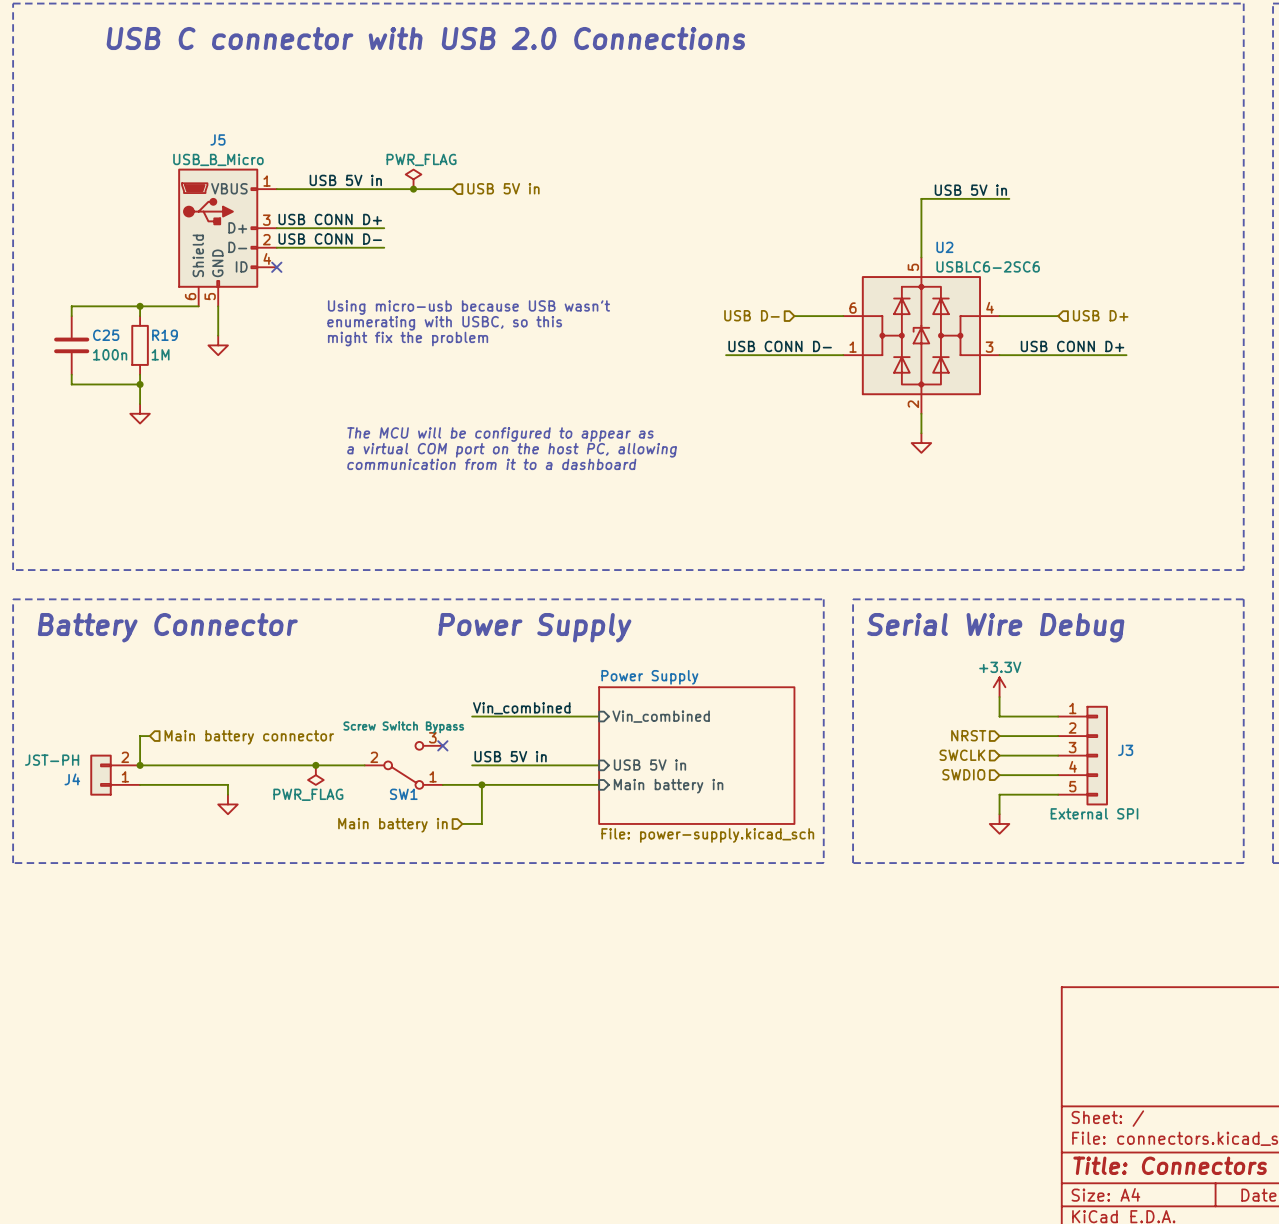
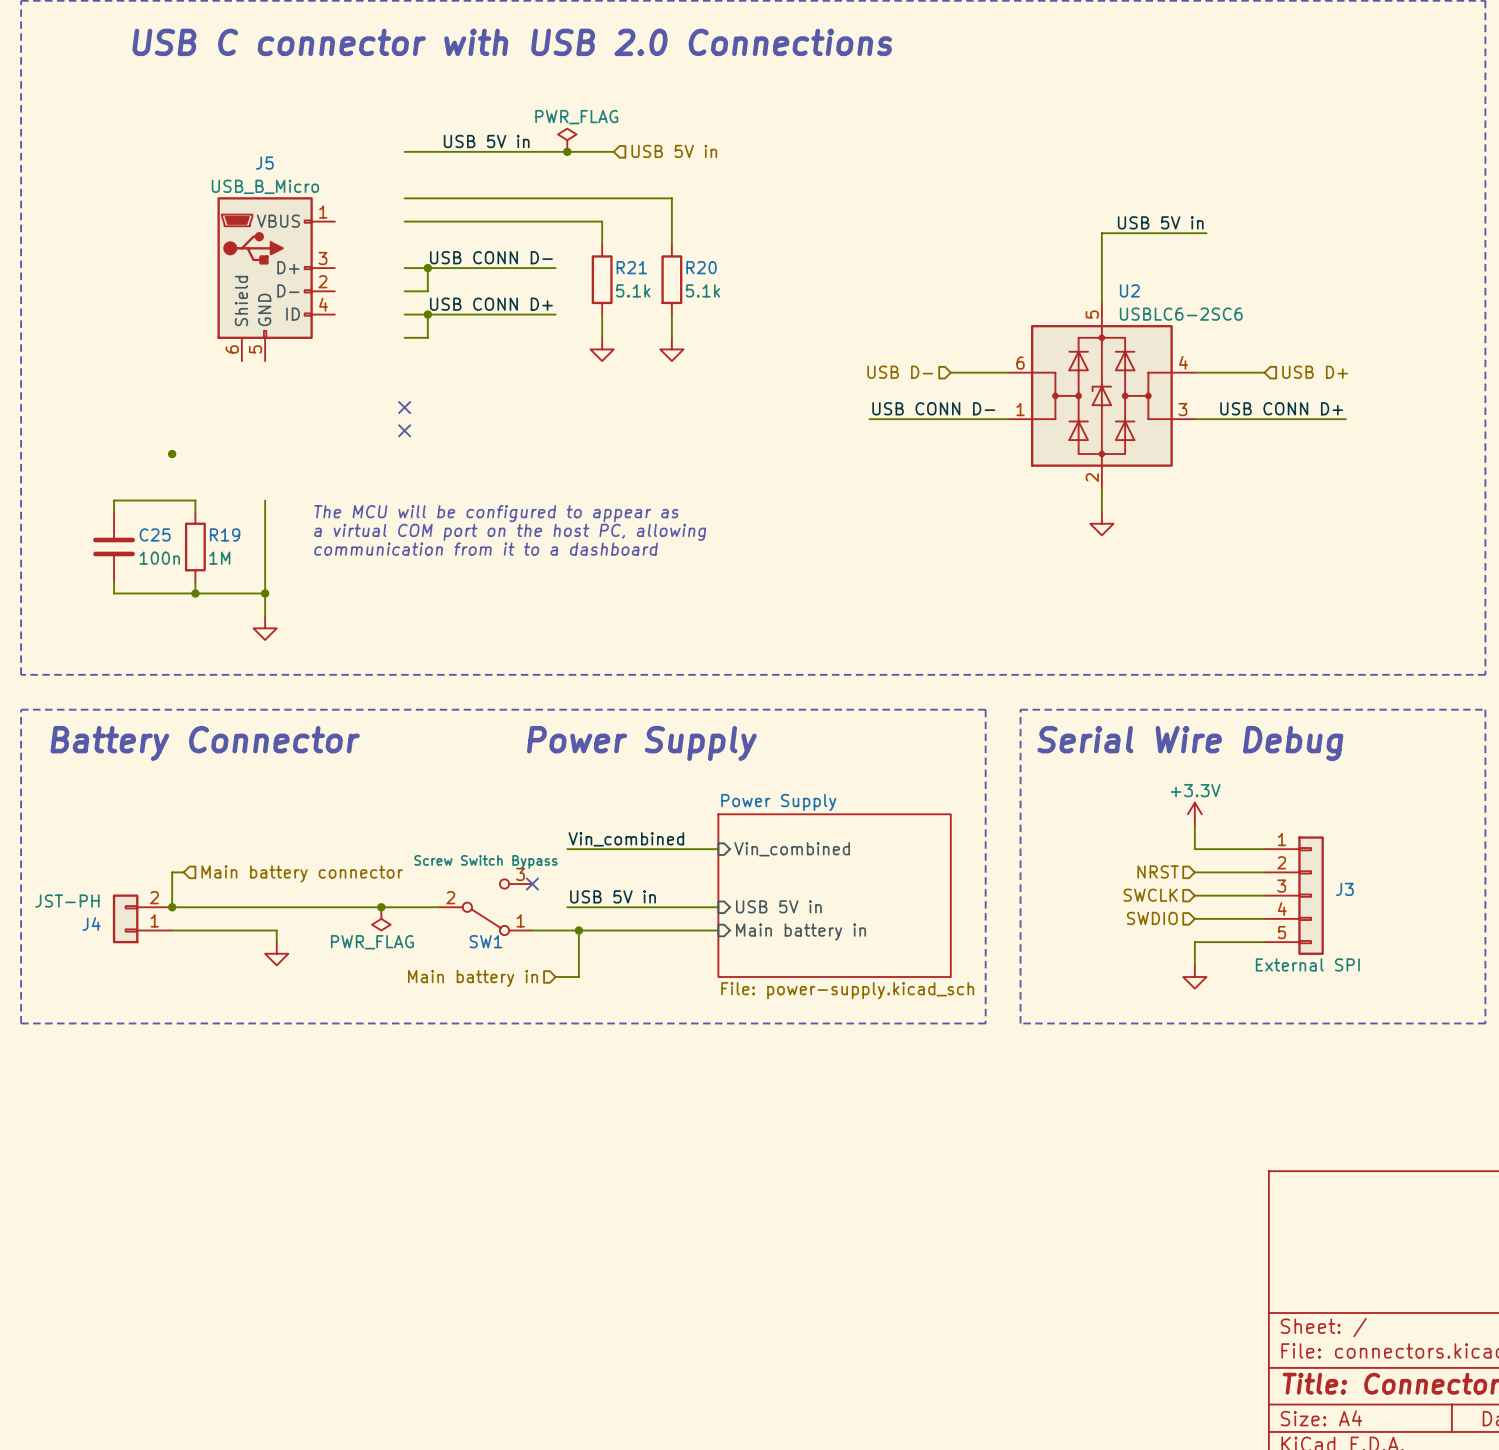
wire: none -> (404, 151) (613, 151)
junction: none -> (567, 151)
wire: none -> (404, 198) (671, 198) (671, 244)
power symbol position: PWR_FLAG (413, 179) -> PWR_FLAG (567, 140)
label position: USB 5V in (345, 180) -> USB 5V in (486, 141)
hierarchical label position: USB 5V in (503, 188) -> USB 5V in (674, 151)
wire: (276, 189) (335, 189) -> none
junction: (413, 189) -> none
wire: none -> (544, 221) (602, 221) (602, 244)
label position: USB CONN D+ (330, 219) -> USB CONN D+ (491, 304)
wire: (276, 228) (335, 228) -> none
junction: none -> (427, 268)
wire: none -> (462, 268) (555, 268)
R21: none -> 5.1k (602, 279)
R20: none -> 5.1k (671, 279)
label position: USB CONN D- (330, 239) -> USB CONN D- (491, 257)
wire: (276, 247) (335, 247) -> none
wire: (354, 247) (384, 247) -> (427, 291) (427, 268)
no-connect mark: (276, 267) -> none
wire: none -> (404, 314) (555, 314)
wire: none -> (427, 314) (427, 337) (404, 337)
junction: none -> (427, 314)
wire: none -> (602, 314) (602, 337)
wire: none -> (671, 314) (671, 337)
power symbol: none -> (602, 349)
power symbol: none -> (671, 349)
wire: (140, 306) (140, 316) -> (195, 581) (195, 593)
junction: (140, 306) -> none
wire: (198, 306) (71, 306) (71, 316) -> none
wire: (218, 306) (218, 335) -> none
text: Using micro-usb because USB wasn't (468, 307) -> none
text: enumerating with USBC, so this (444, 323) -> none
text: might fix the problem (408, 339) -> none
C25 position: (71, 345) -> (114, 547)
R19 position: (140, 345) -> (195, 547)
power symbol: (218, 345) -> none
no-connect mark: none -> (404, 407)
no-connect mark: none -> (404, 430)
wire: (71, 374) (71, 384) (140, 384) -> none
wire: (140, 374) (140, 404) -> none
power symbol: (140, 413) -> none
wire: none -> (265, 500) (265, 616)
wire: none -> (114, 512) (114, 500) (195, 500) (195, 512)
text position: The MCU will be configured to appear as (500, 434) -> The MCU will be configured to appear as (496, 513)
text position: a virtual COM port on the host PC, allowing (512, 450) -> a virtual COM port on the host PC, allowing (510, 532)
text position: communication from it to a dashboard (491, 464) -> communication from it to a dashboard (486, 549)
wire: none -> (114, 581) (114, 593) (265, 593)
junction: none -> (195, 593)
junction: none -> (265, 593)
power symbol: none -> (265, 628)

